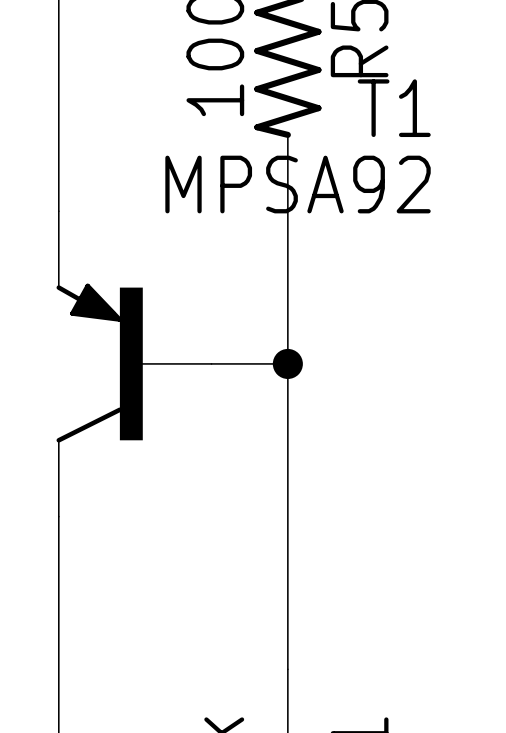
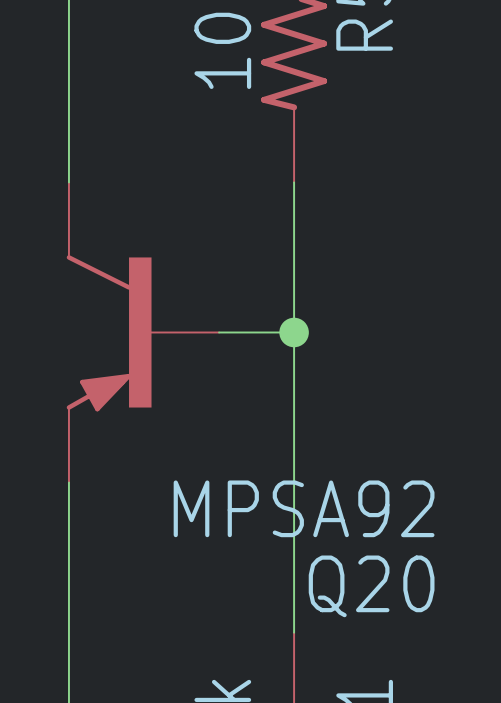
T1: MPSA92 (134, 363) -> none
Q20: none -> MPSA92 (142, 332)

